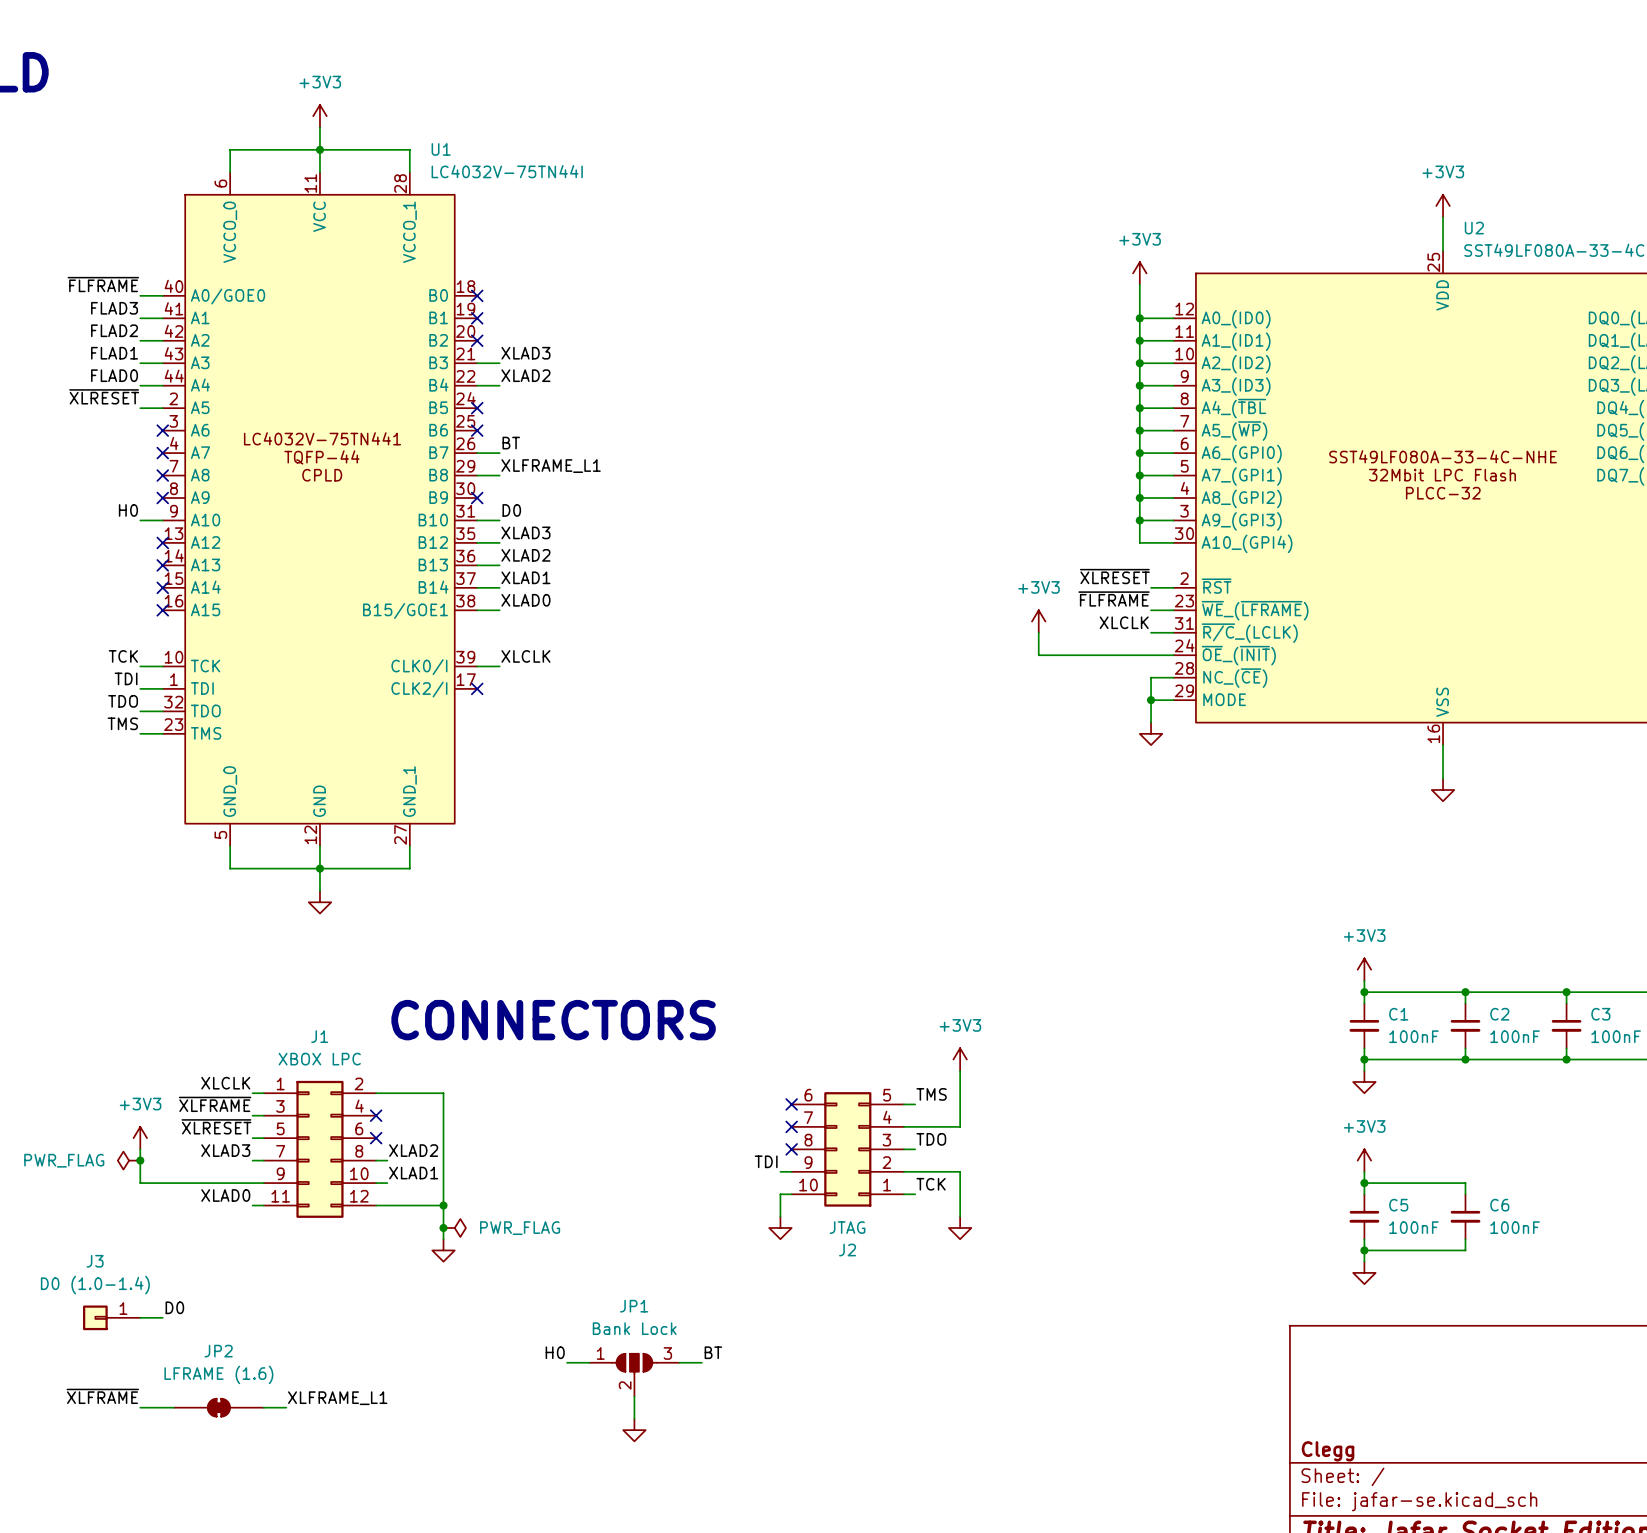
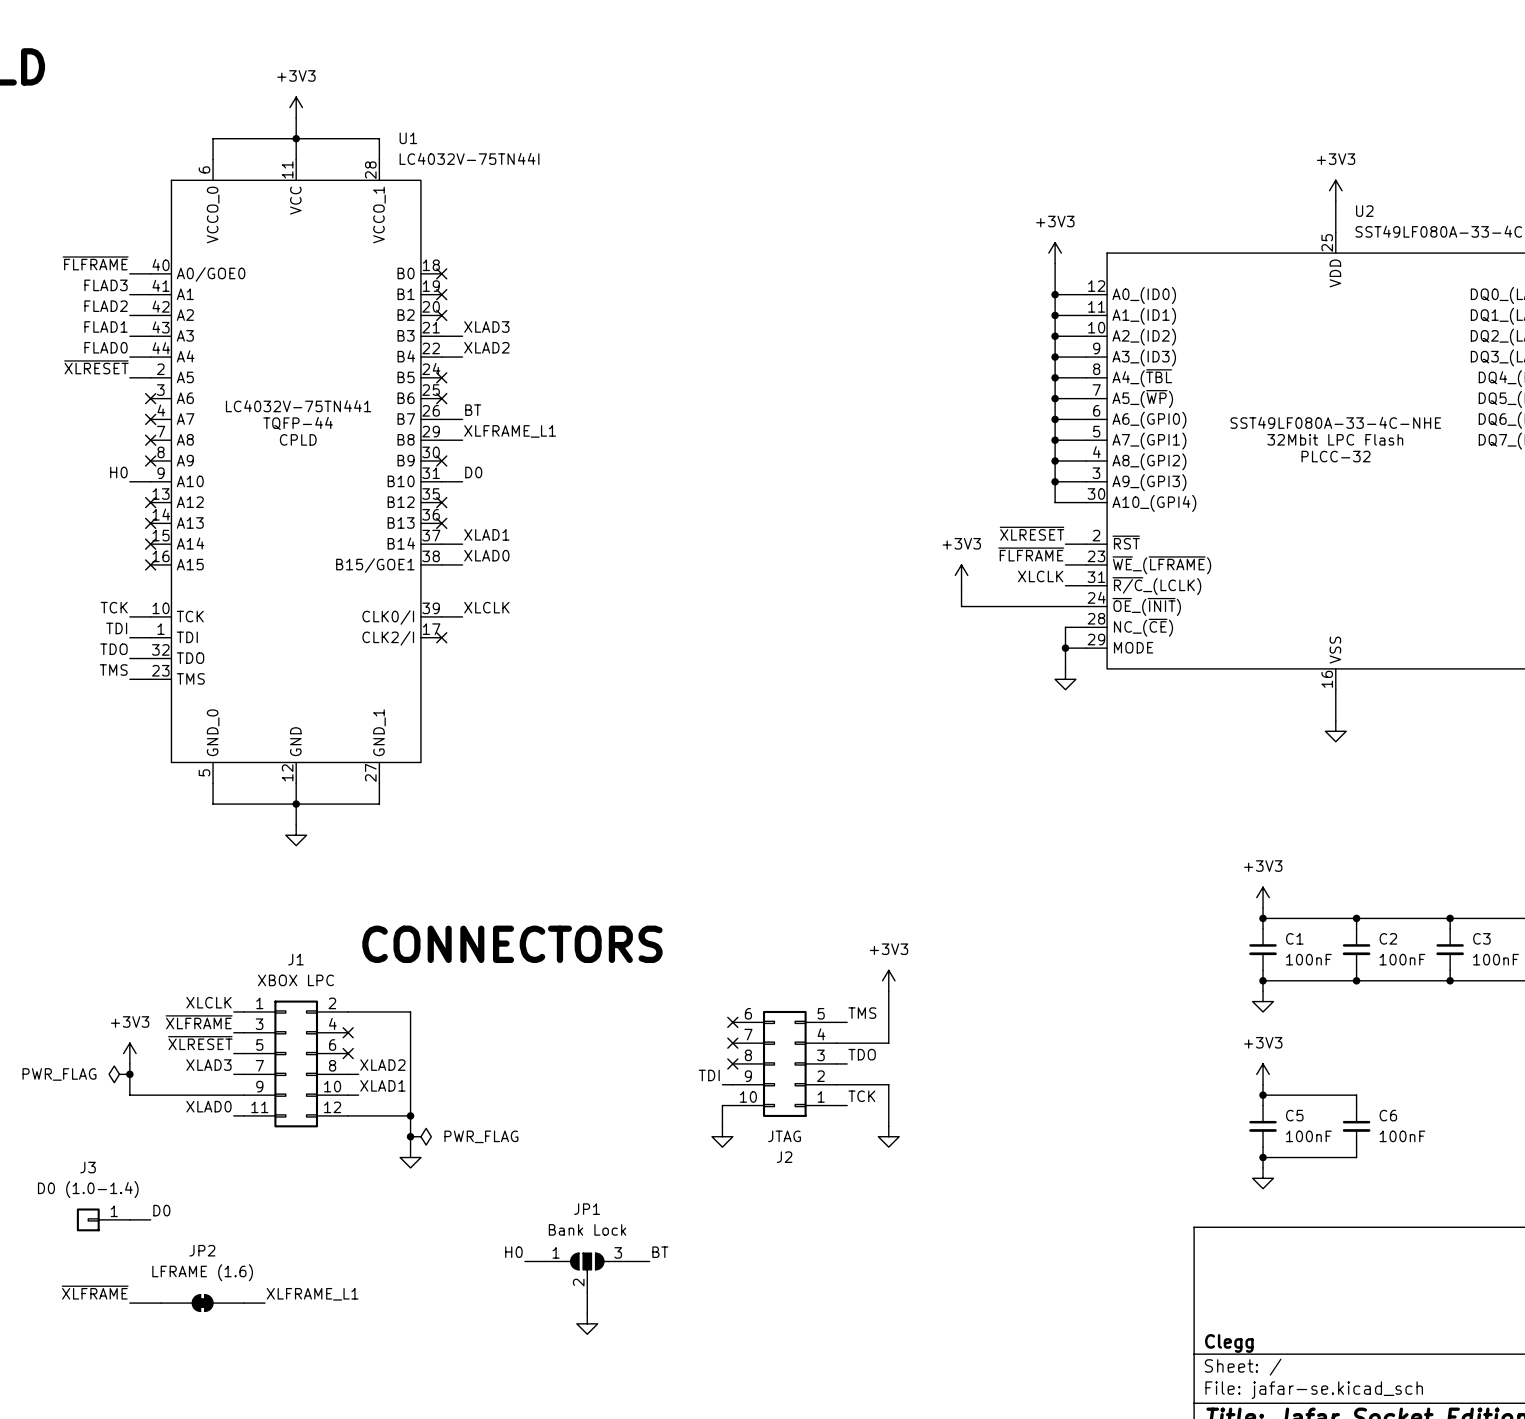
label: XLAD3 (525, 532) -> none
wire: (477, 542) (499, 542) -> none
no-connect mark: none -> (441, 502)
label: XLAD2 (525, 555) -> none
wire: (477, 565) (499, 565) -> none
no-connect mark: none -> (441, 523)

